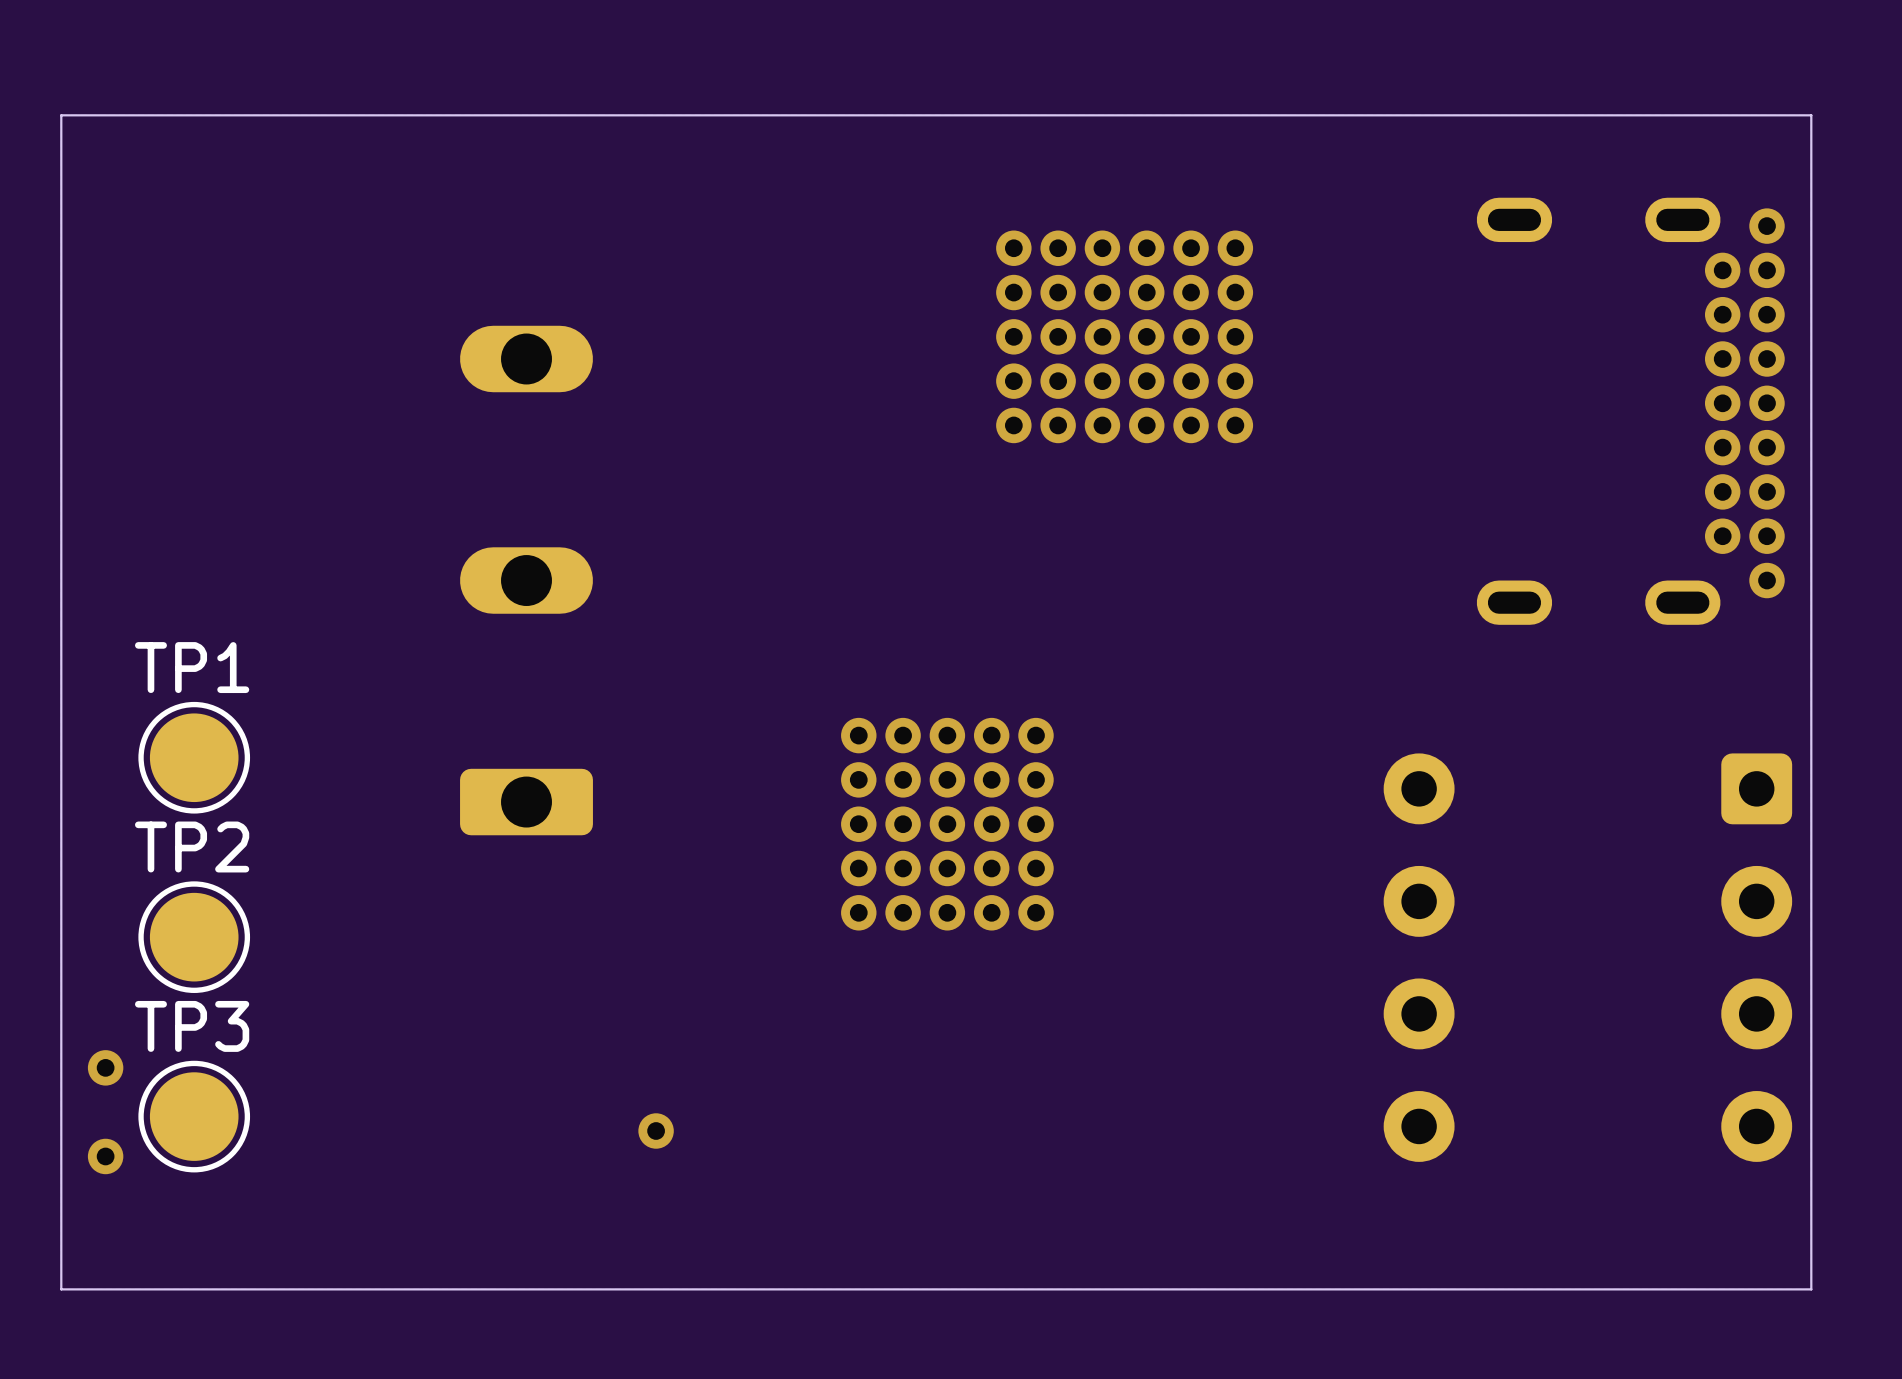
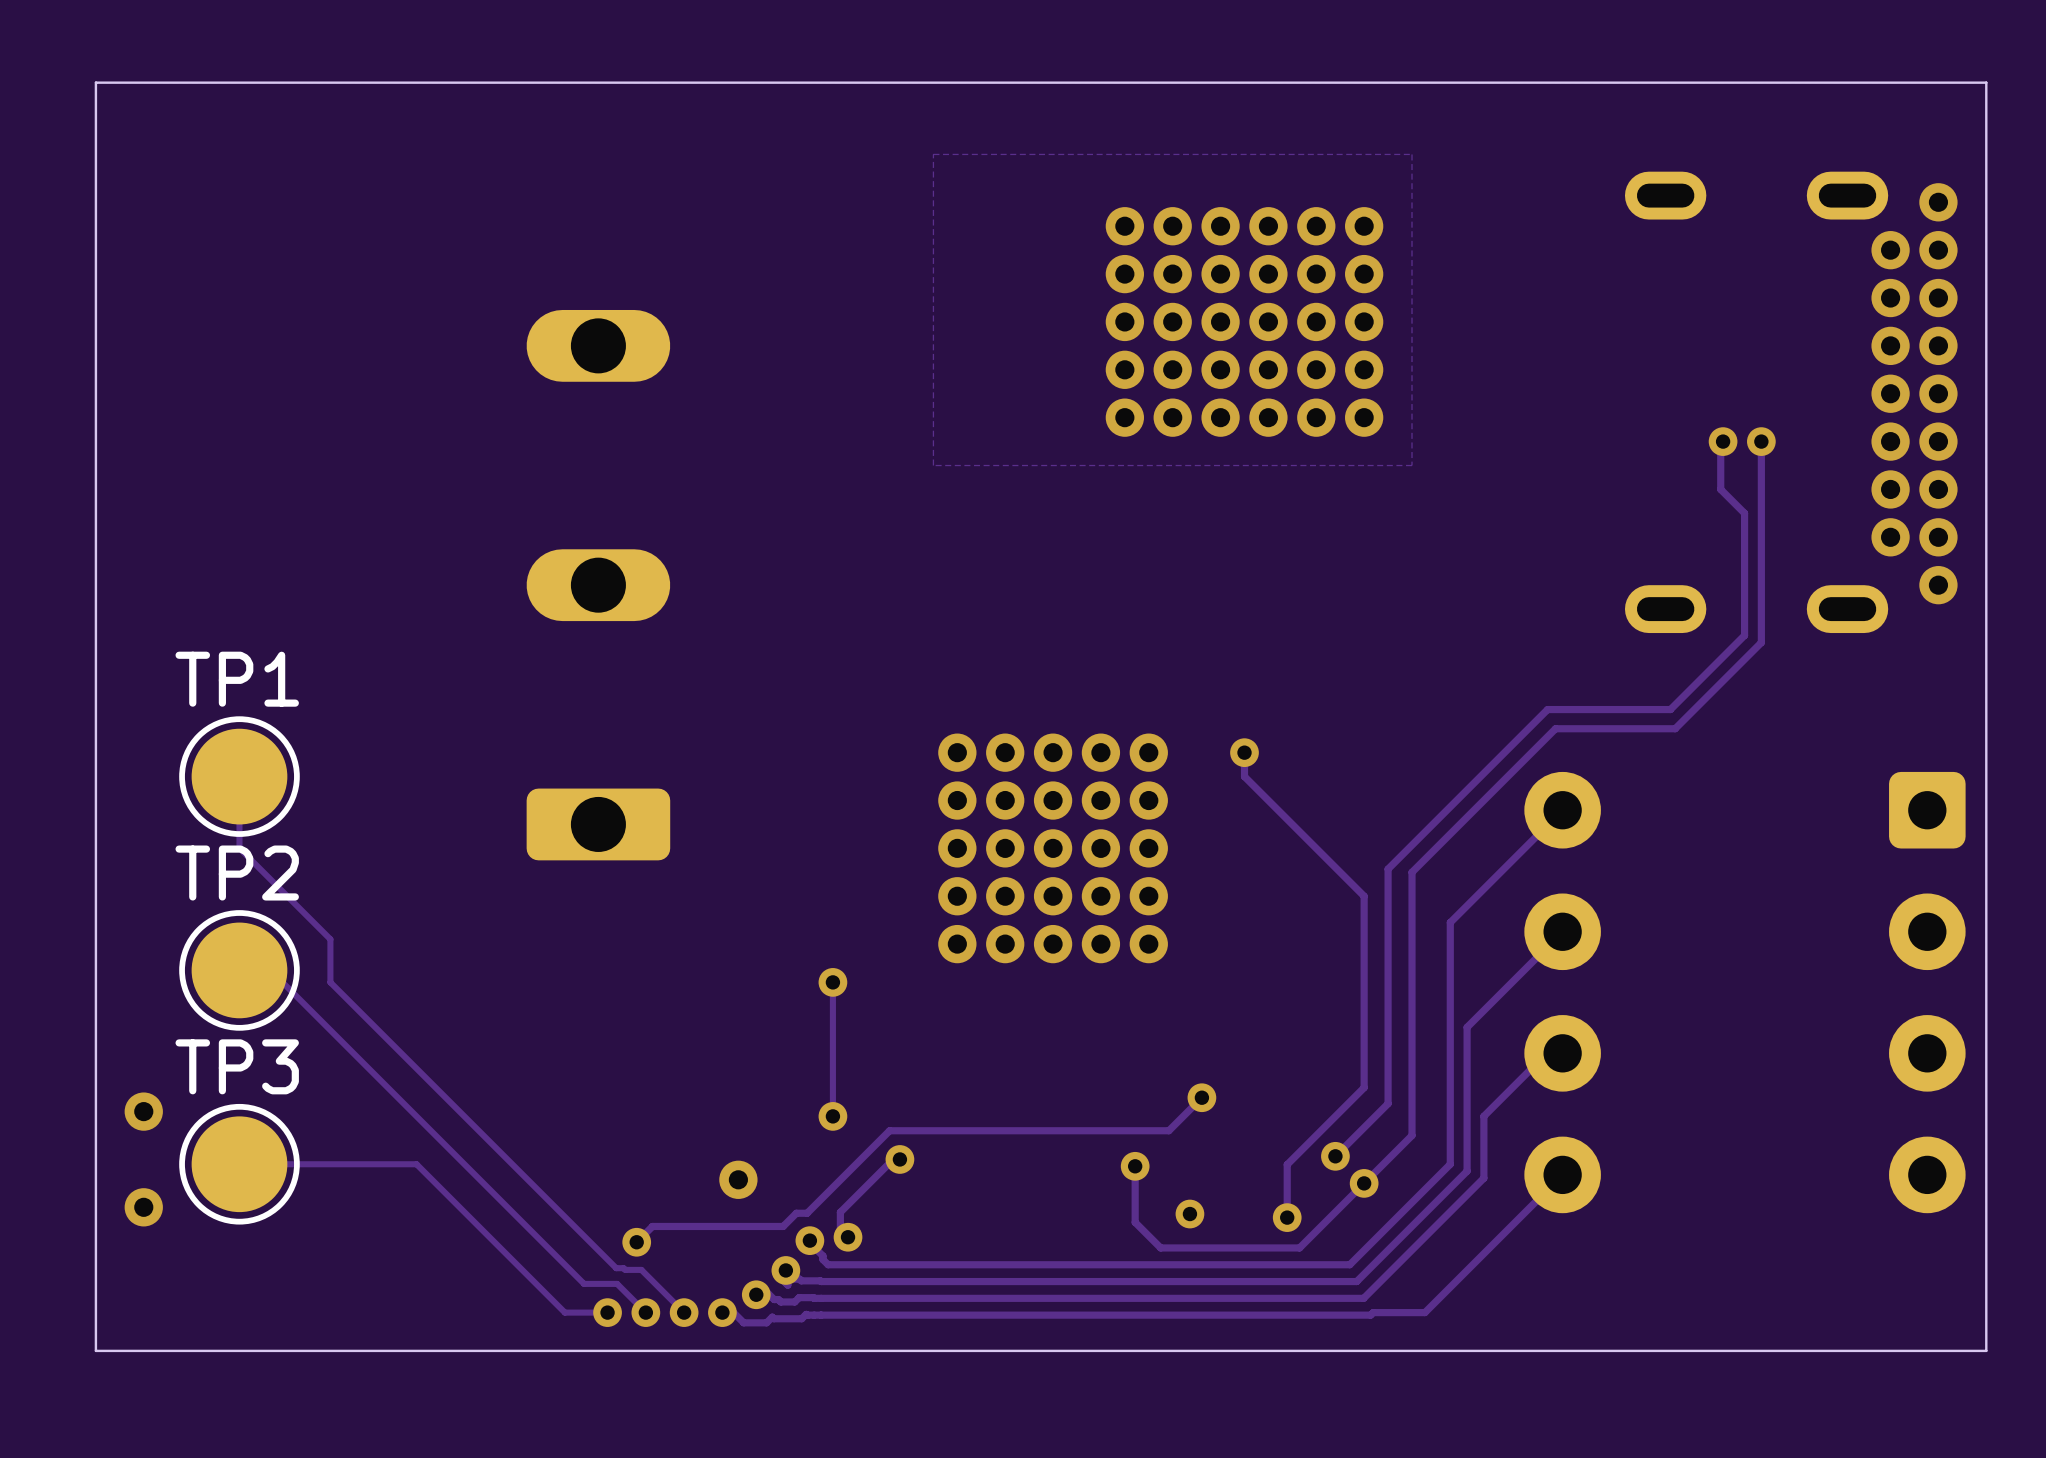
zone outline: none -> (1412, 154) (1412, 465) (933, 465) (933, 154) (1412, 154)
track: none -> (1723, 441) (1720, 443) (1720, 489) (1744, 513) (1744, 635) (1670, 709) (1547, 709) (1388, 869) (1388, 1103) (1335, 1156)
via: none -> (1723, 441)
track: none -> (1761, 441) (1761, 642) (1675, 728) (1555, 728) (1412, 872) (1412, 1135) (1299, 1247) (1160, 1247) (1135, 1222) (1135, 1166)
via: none -> (1761, 441)
track: none -> (1244, 752) (1244, 776) (1364, 896) (1364, 1087) (1287, 1164) (1287, 1217)
via: none -> (1244, 752)
track: none -> (239, 776) (239, 848) (330, 939) (330, 982) (616, 1268) (641, 1269) (684, 1312)
track: none -> (1562, 810) (1450, 922) (1450, 1164) (1349, 1264) (828, 1264) (822, 1259) (822, 1256) (808, 1242)
track: none -> (1562, 931) (1467, 1027) (1467, 1171) (1356, 1281) (821, 1281) (787, 1279) (787, 1285) (785, 1282) (785, 1270)
track: none -> (239, 970) (270, 970) (584, 1283) (617, 1283) (645, 1312)
track: none -> (832, 982) (832, 1116)
via: none -> (832, 982)
track: none -> (1562, 1053) (1546, 1053) (1483, 1116) (1483, 1178) (1363, 1298) (799, 1297) (794, 1301) (780, 1301) (774, 1299) (768, 1293) (756, 1294)
track: none -> (1201, 1097) (1168, 1130) (889, 1130) (807, 1213) (796, 1213) (783, 1226) (652, 1226) (636, 1242)
via: none -> (1201, 1097)
via: none -> (832, 1116)
via: none -> (1335, 1156)
track: none -> (899, 1159) (893, 1159) (840, 1212) (840, 1229) (848, 1237)
via: none -> (899, 1159)
track: none -> (239, 1164) (416, 1164) (564, 1312) (607, 1312)
via: none -> (1135, 1166)
track: none -> (1562, 1174) (1424, 1312) (1373, 1312) (1370, 1315) (806, 1314)
via: none -> (1364, 1183)
via: none -> (1189, 1214)
via: none -> (1287, 1217)
via: none -> (848, 1237)
via: none -> (809, 1240)
via: none -> (636, 1242)
via: none -> (785, 1270)
via: none -> (756, 1294)
via: none -> (607, 1312)
via: none -> (645, 1312)
via: none -> (684, 1312)
track: none -> (722, 1312) (733, 1312) (743, 1322) (766, 1322) (772, 1317) (773, 1318) (801, 1318) (806, 1314)
via: none -> (722, 1312)

